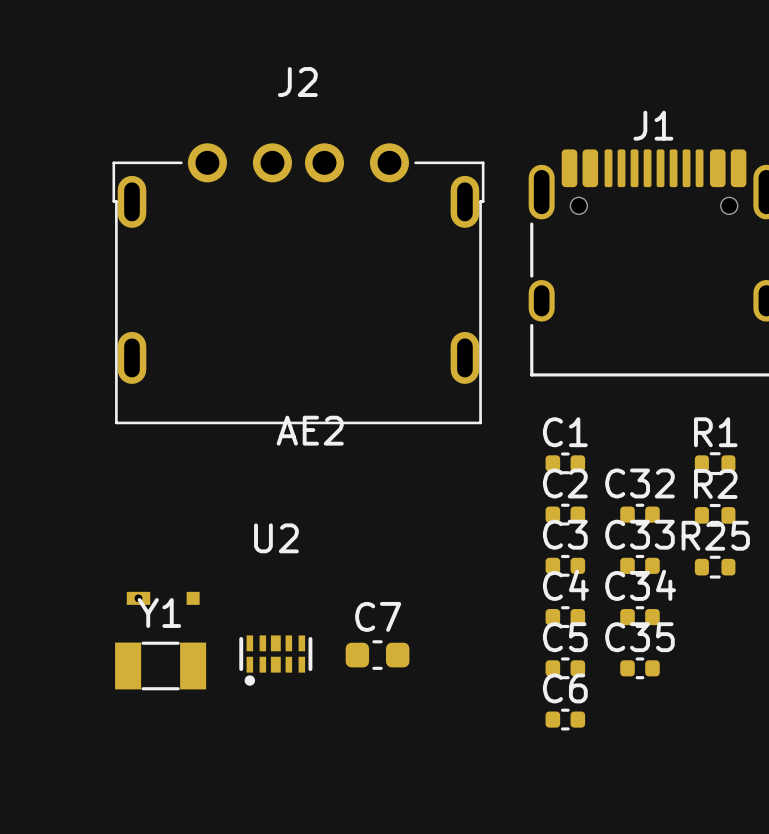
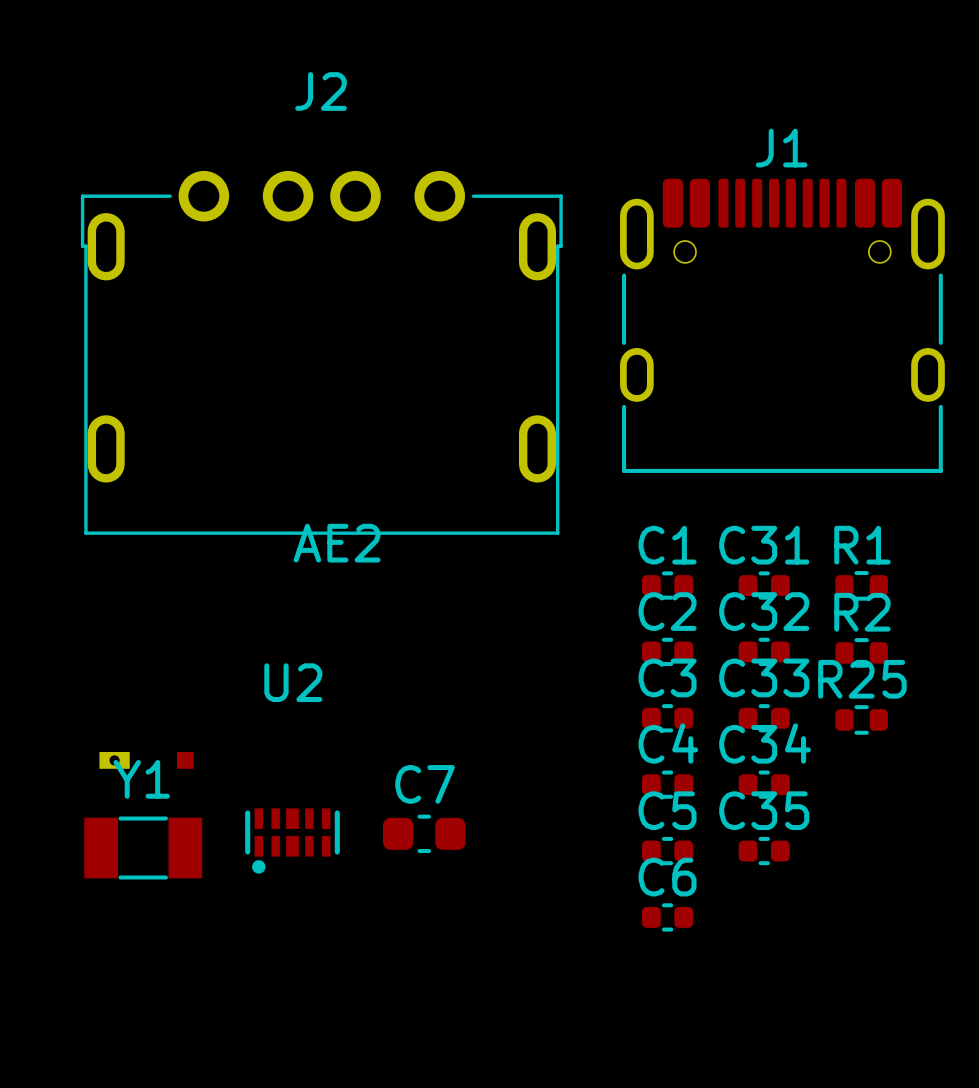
C31: none -> (764, 585)

